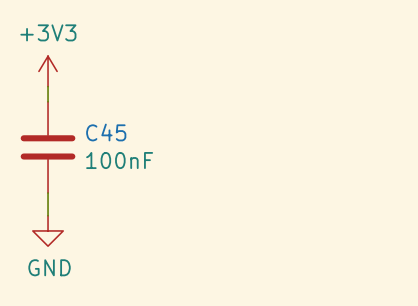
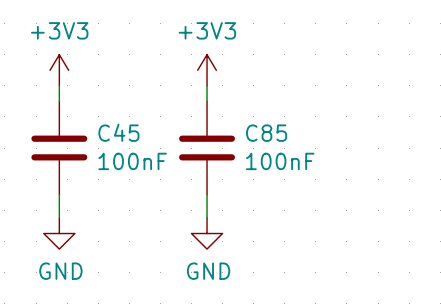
power symbol: none -> +3V3 (207, 70)
wire: none -> (207, 85) (207, 101)
C85: none -> 100nF (207, 148)
wire: none -> (207, 194) (207, 217)
power symbol: none -> GND (207, 233)

